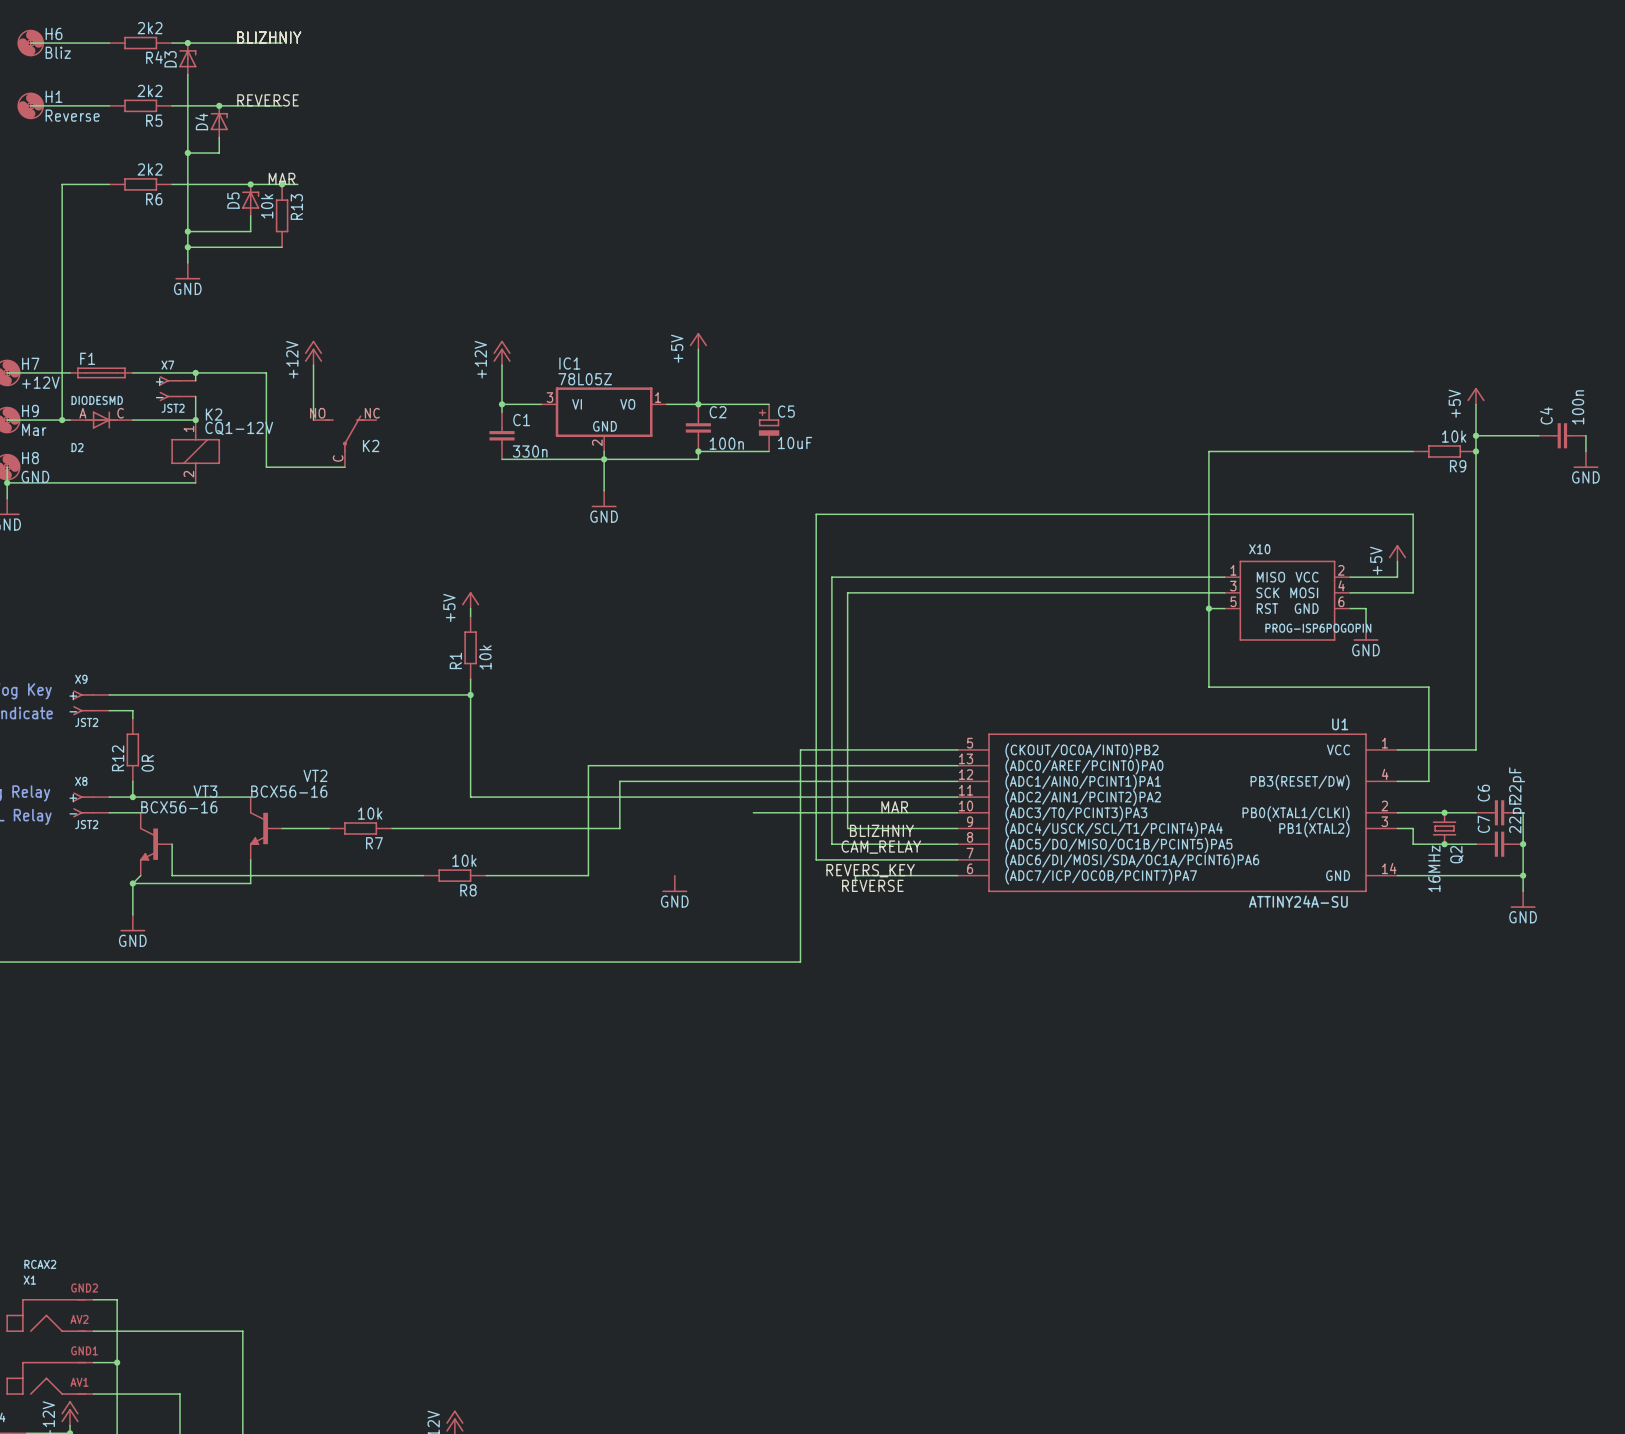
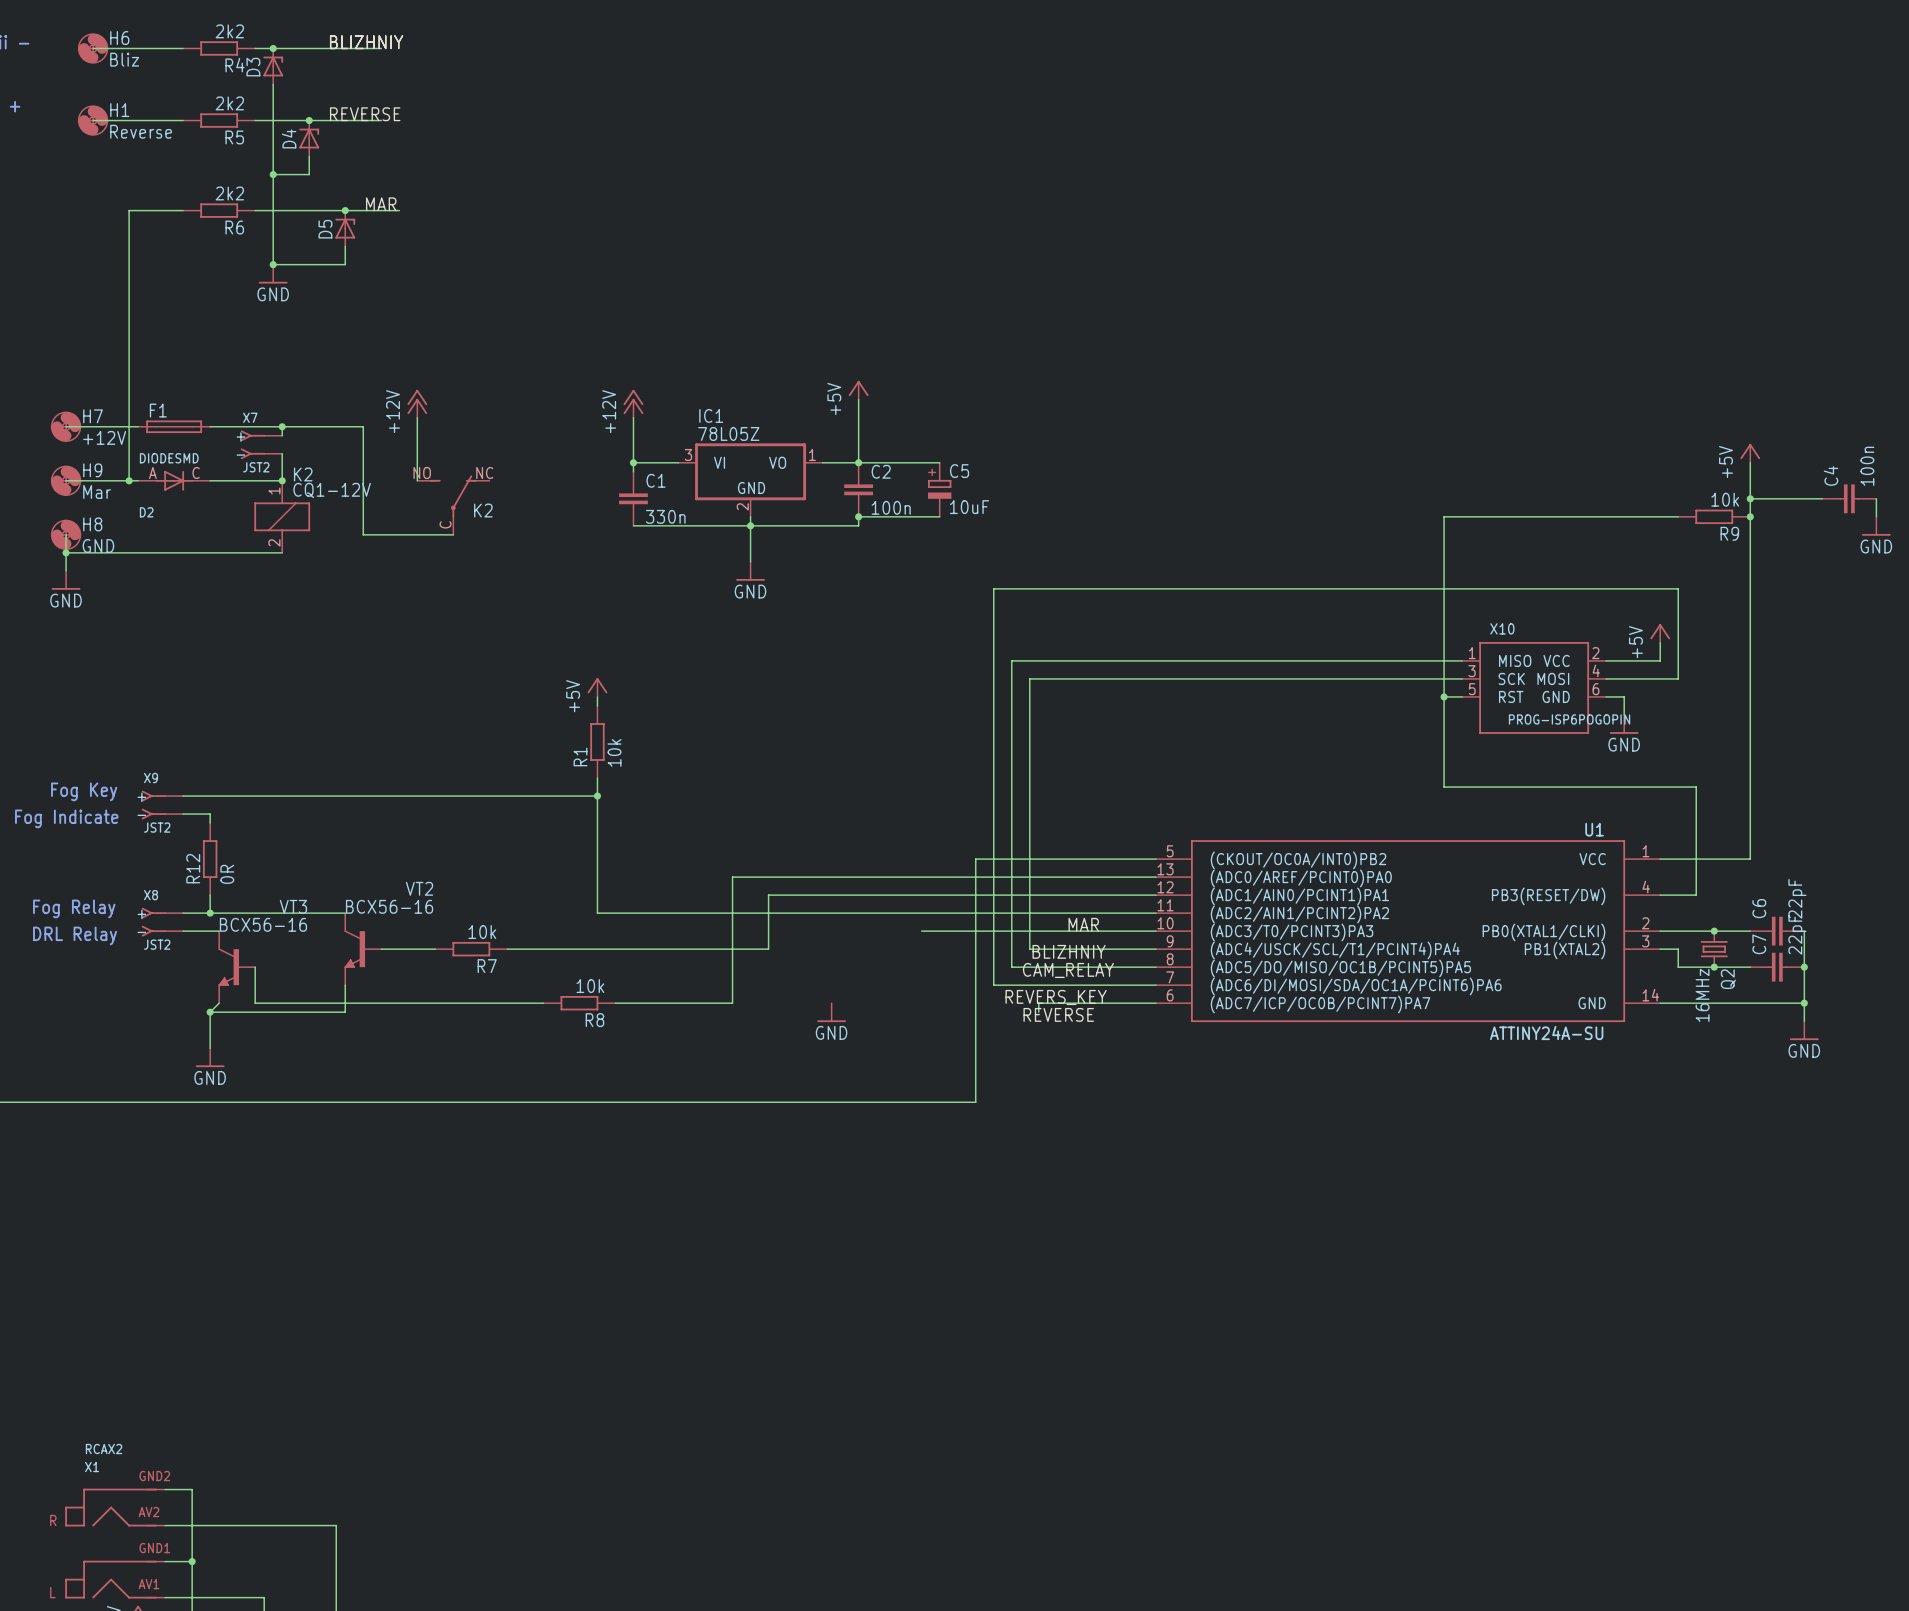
junction: (282, 184) -> none
R13: 10k (282, 215) -> none
wire: (187, 247) (282, 247) -> none
junction: (187, 247) -> none
power symbol position: GND (187, 271) -> GND (273, 274)

